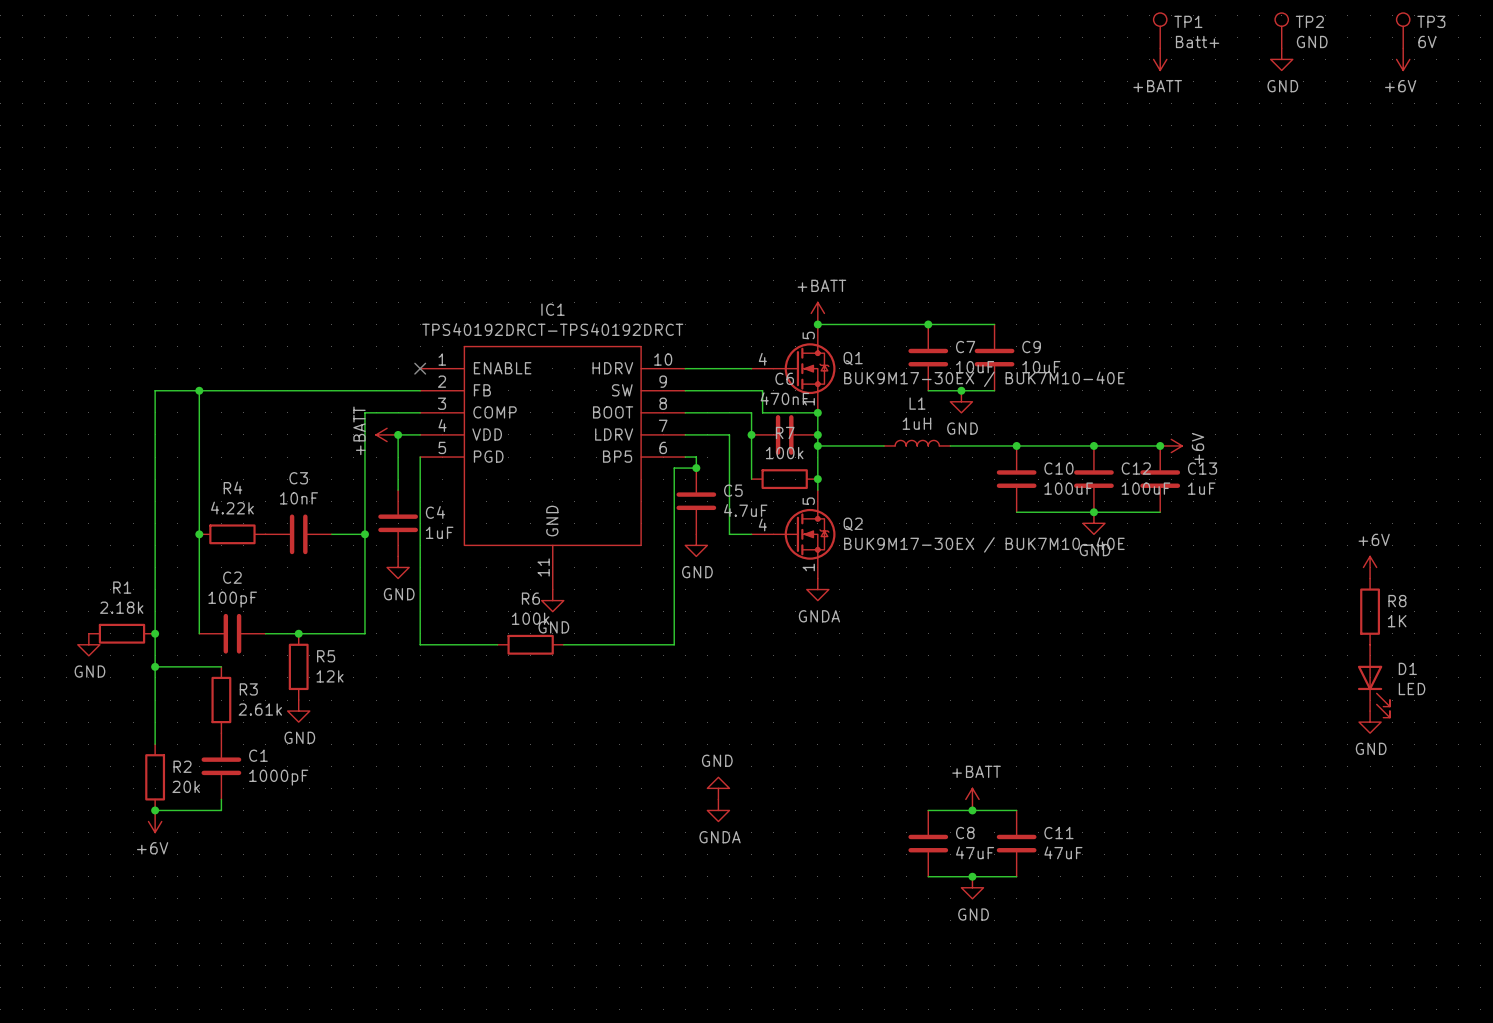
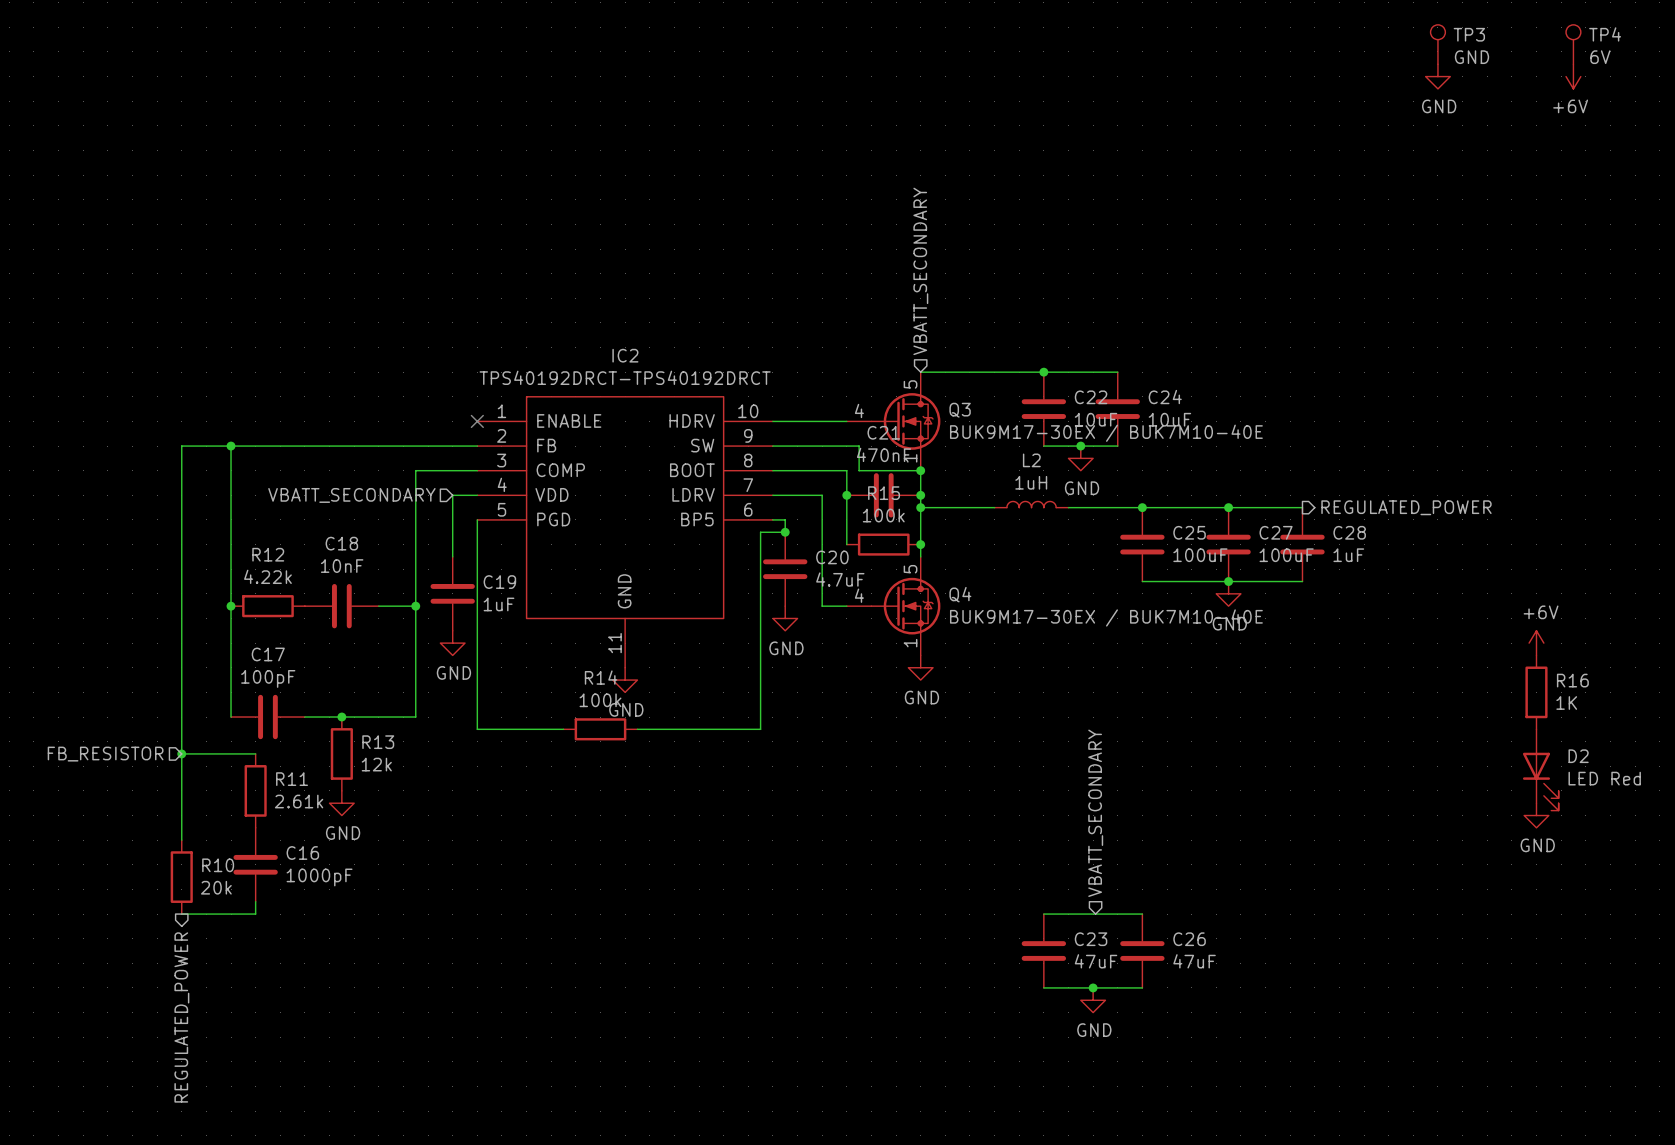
TP2 name: TP2 (1309, 21) -> TP3 (1469, 34)
TP3 name: TP3 (1431, 21) -> TP4 (1605, 34)
TP1: Batt+ (1160, 30) -> none
power symbol: +BATT (1160, 59) -> none
hierarchical label: none -> VBATT_SECONDARY (920, 271)
IC1 name: IC1 (553, 309) -> IC2 (625, 355)
power symbol: +BATT (817, 313) -> none
junction: (817, 324) -> none
C7 name: C7 (965, 347) -> C22 (1091, 397)
C9 name: C9 (1031, 347) -> C24 (1165, 397)
Q1 name: Q1 (853, 358) -> Q3 (960, 410)
C6 name: C6 (784, 378) -> C21 (883, 432)
L1 name: L1 (917, 403) -> L2 (1031, 460)
R7 name: R7 (785, 432) -> R15 (884, 493)
power symbol: +BATT (387, 434) -> none
junction: (398, 434) -> none
hierarchical label: none -> VBATT_SECONDARY (351, 495)
junction: (1160, 445) -> none
power symbol: +6V (1171, 445) -> none
hierarchical label: none -> REGULATED_POWER (1406, 507)
C10 name: C10 (1058, 468) -> C25 (1189, 532)
C12 name: C12 (1136, 468) -> C27 (1276, 532)
C13 name: C13 (1202, 468) -> C28 (1349, 532)
C3 name: C3 (298, 478) -> C18 (341, 543)
R4 name: R4 (232, 487) -> R12 (268, 554)
C5 name: C5 (733, 490) -> C20 (832, 557)
C4 name: C4 (435, 512) -> C19 (499, 582)
Q2 name: Q2 (853, 524) -> Q4 (960, 594)
C2 name: C2 (232, 577) -> C17 (268, 654)
power symbol: GNDA (817, 589) -> GND (920, 667)
R6 name: R6 (530, 598) -> R14 (601, 677)
R8 name: R8 (1397, 601) -> R16 (1572, 680)
R1: 2.18k (121, 633) -> none
junction: (155, 633) -> none
power symbol: GND (88, 644) -> none
R5 name: R5 (326, 656) -> R13 (378, 742)
hierarchical label: none -> FB_RESISTOR (105, 754)
D1 name: D1 (1407, 668) -> D2 (1578, 756)
D1 value: LED (1412, 688) -> LED Red (1604, 778)
R3 name: R3 (248, 689) -> R11 (292, 779)
hierarchical label: none -> VBATT_SECONDARY (1095, 813)
C1 name: C1 (258, 755) -> C16 (302, 853)
R2 name: R2 (182, 766) -> R10 (218, 865)
power symbol: GND (718, 788) -> none
power symbol: +BATT (972, 799) -> none
junction: (155, 810) -> none
power symbol: GNDA (718, 810) -> none
junction: (972, 810) -> none
power symbol: +6V (155, 821) -> none
C8 name: C8 (965, 833) -> C23 (1091, 939)
C11 name: C11 (1058, 833) -> C26 (1189, 939)
hierarchical label: none -> REGULATED_POWER (181, 1017)

